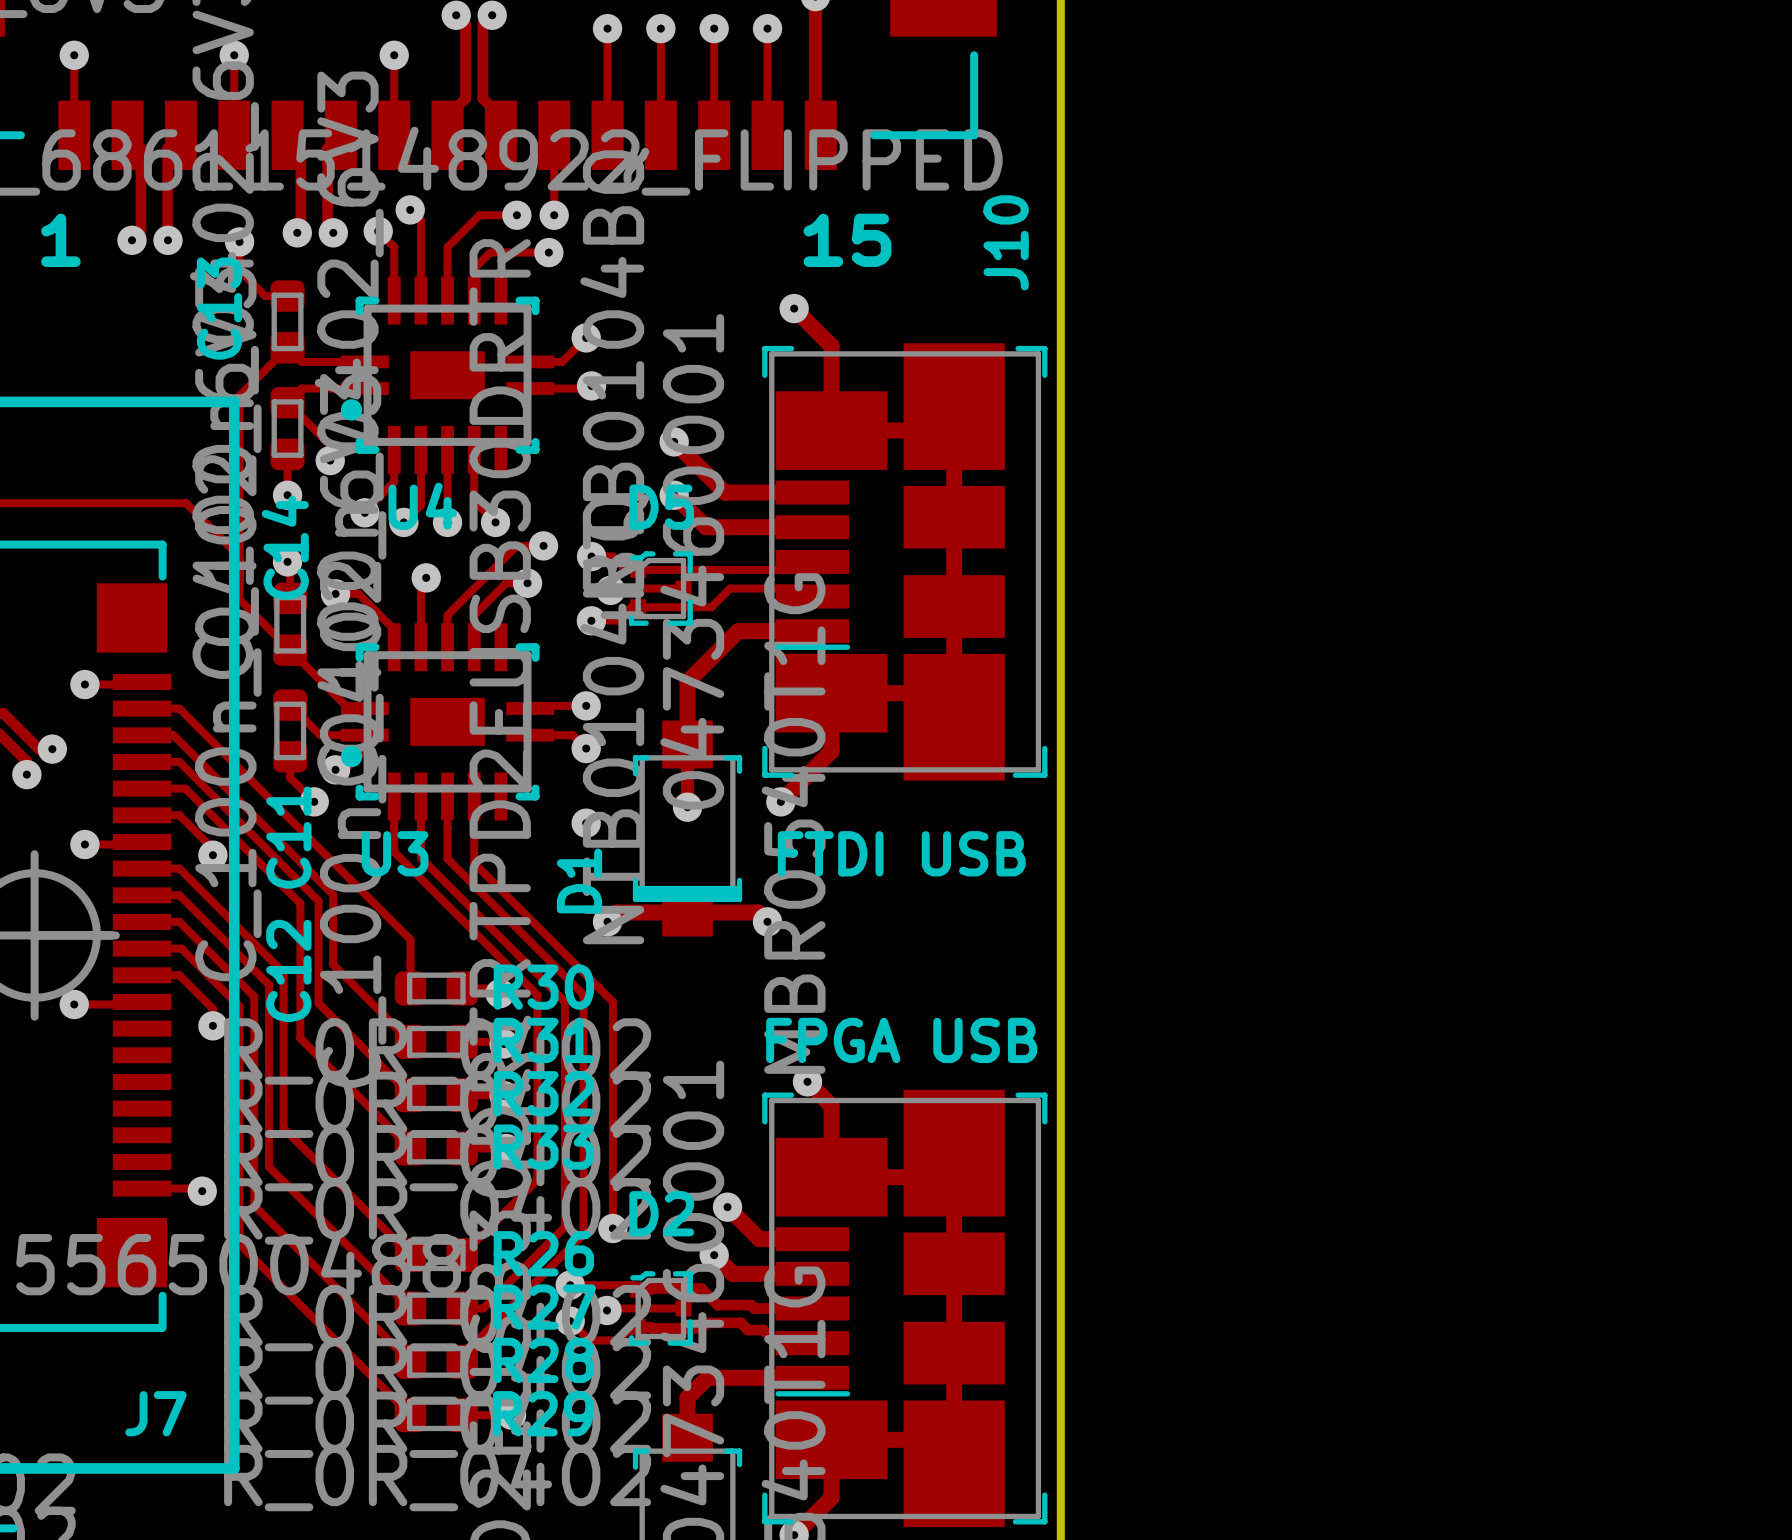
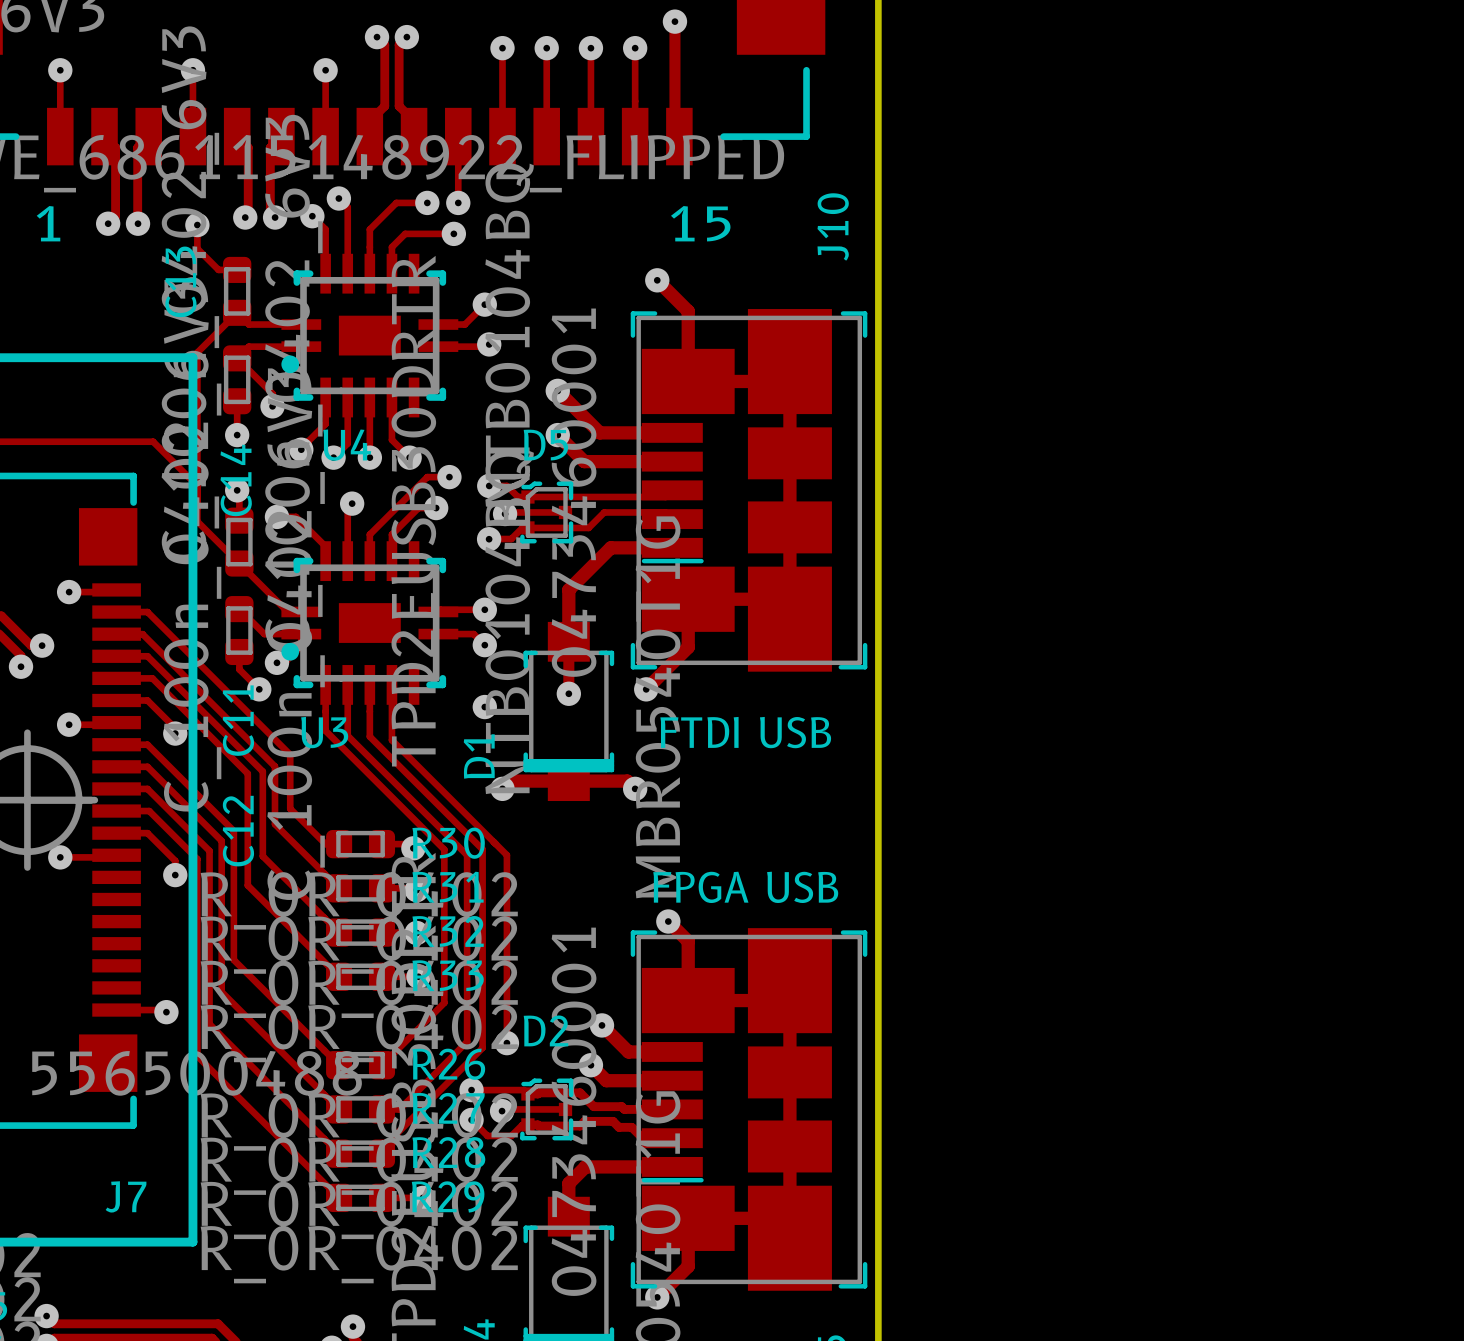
track: (351, 880) (410, 939) (410, 988) -> (290, 754) (290, 808) (325, 844) (339, 844)

